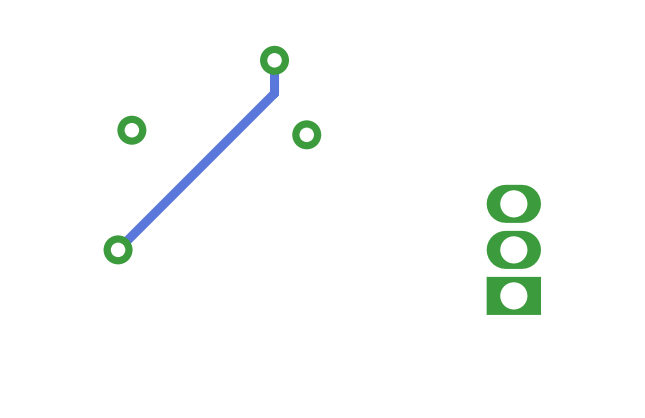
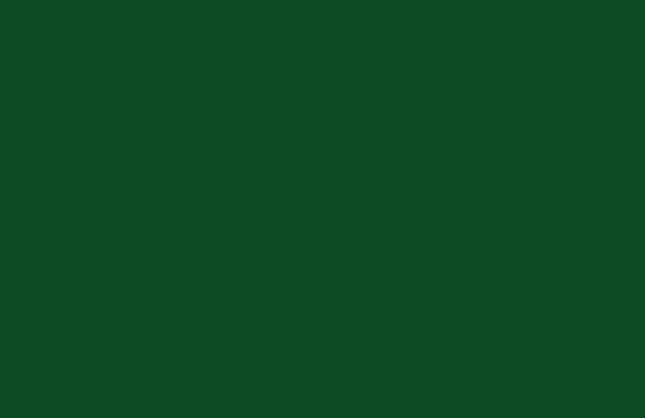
track: (274, 60) (274, 93) (118, 249) -> none
via: (274, 60) -> none
via: (131, 130) -> none
via: (306, 134) -> none
via: (118, 249) -> none
part: (513, 249) -> none

